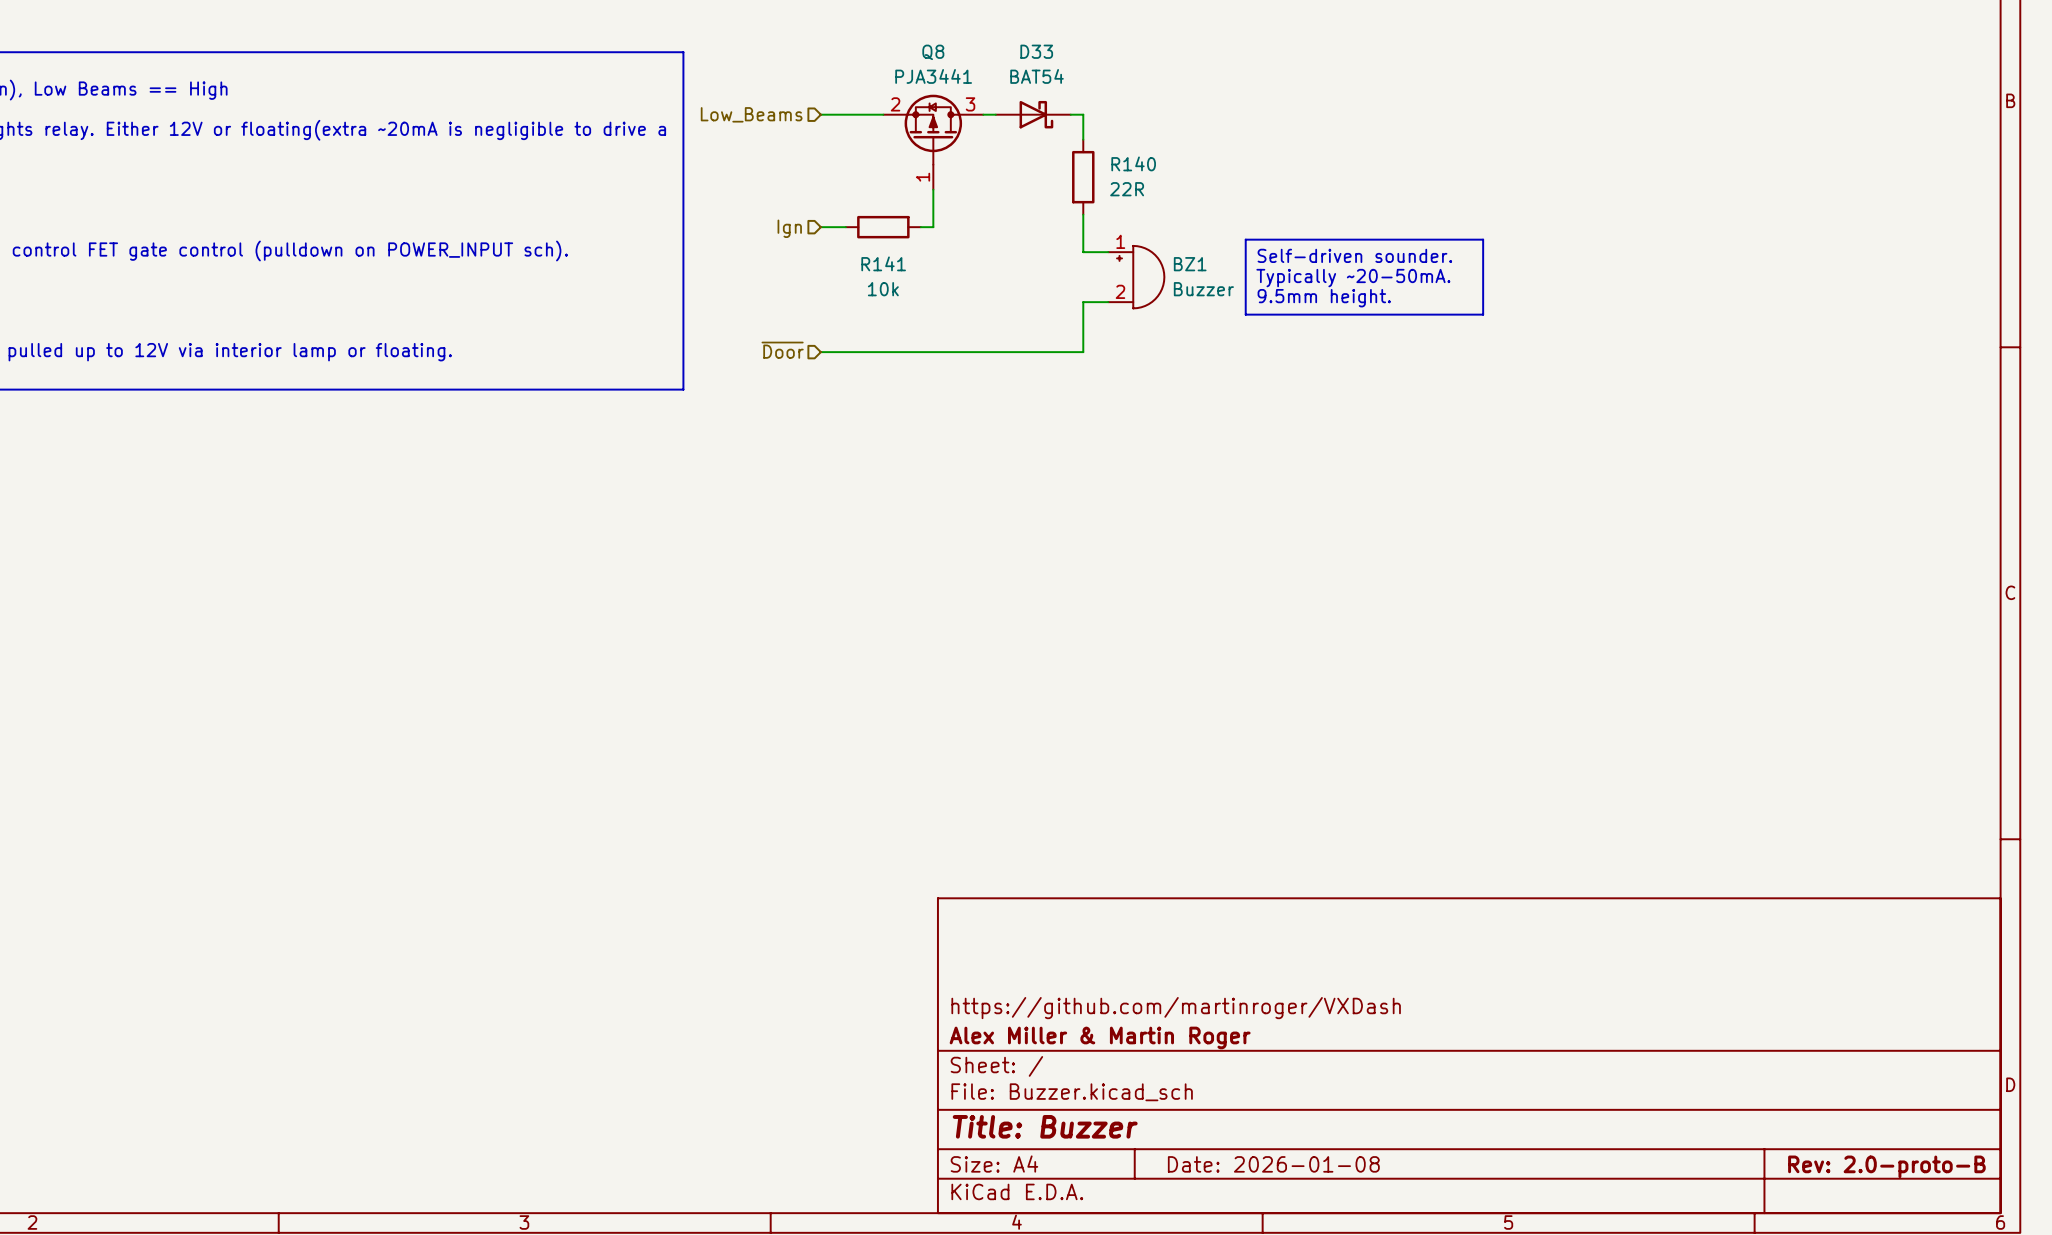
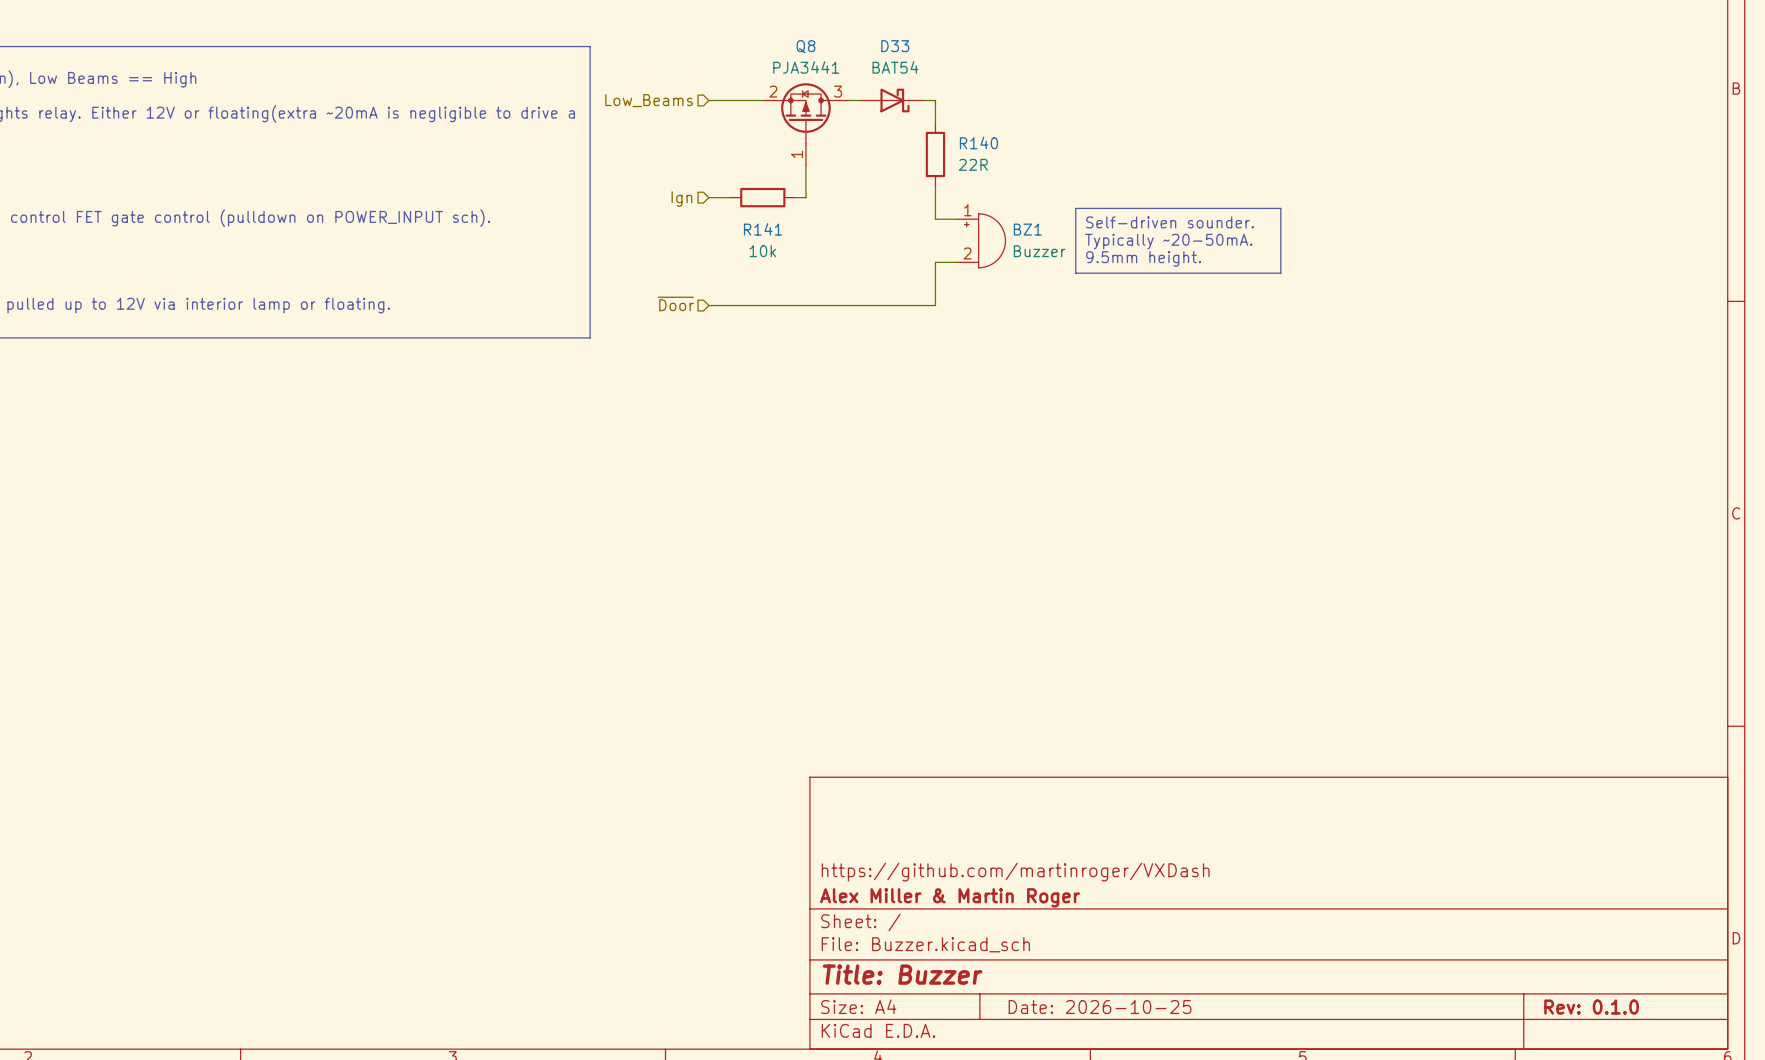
title block: Date: 2026-01-08 (1273, 1164) -> Date: 2026-10-25 (1100, 1007)
title block: Rev: 2.0-proto-B (1886, 1166) -> Rev: 0.1.0 (1591, 1007)

